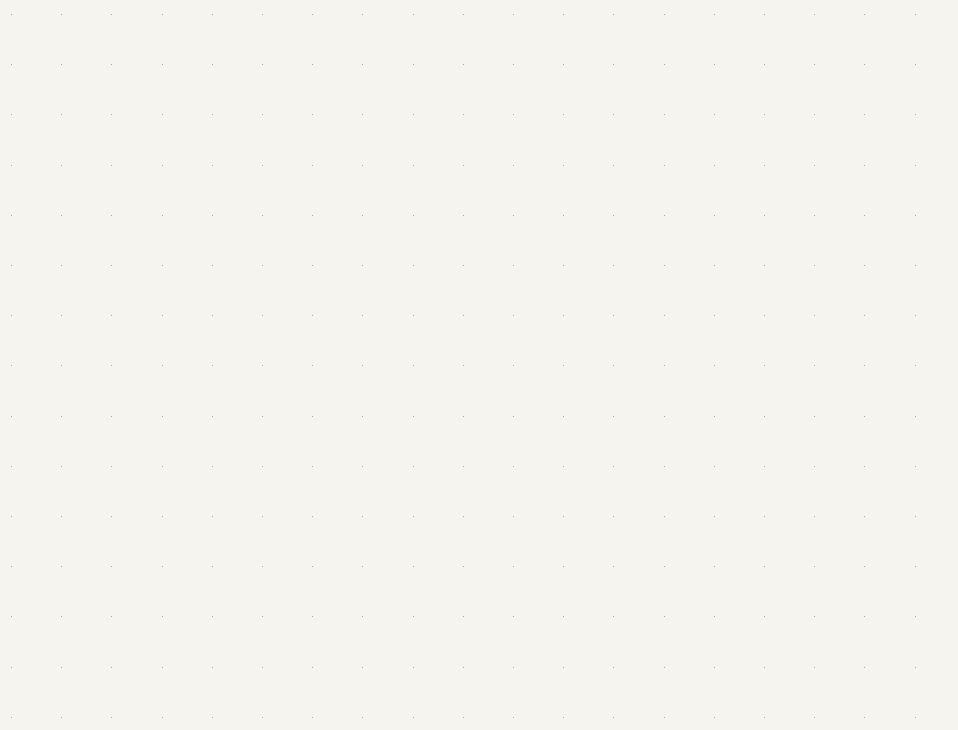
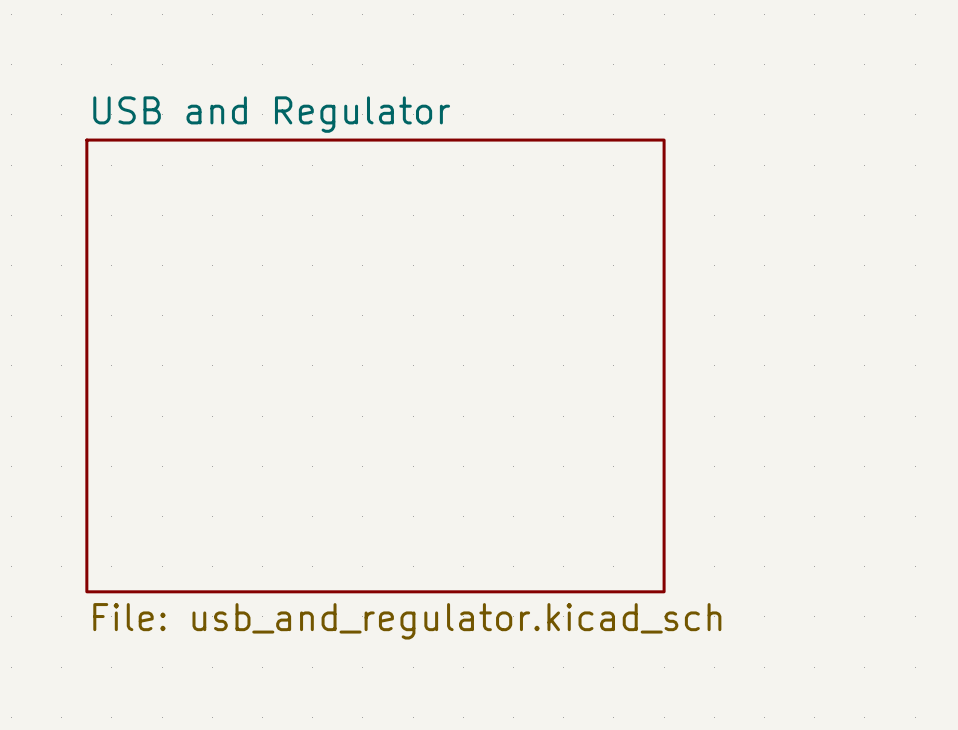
sheet USB and Regulator: none -> File: usb_and_regulator.kicad_sch (375, 365)

